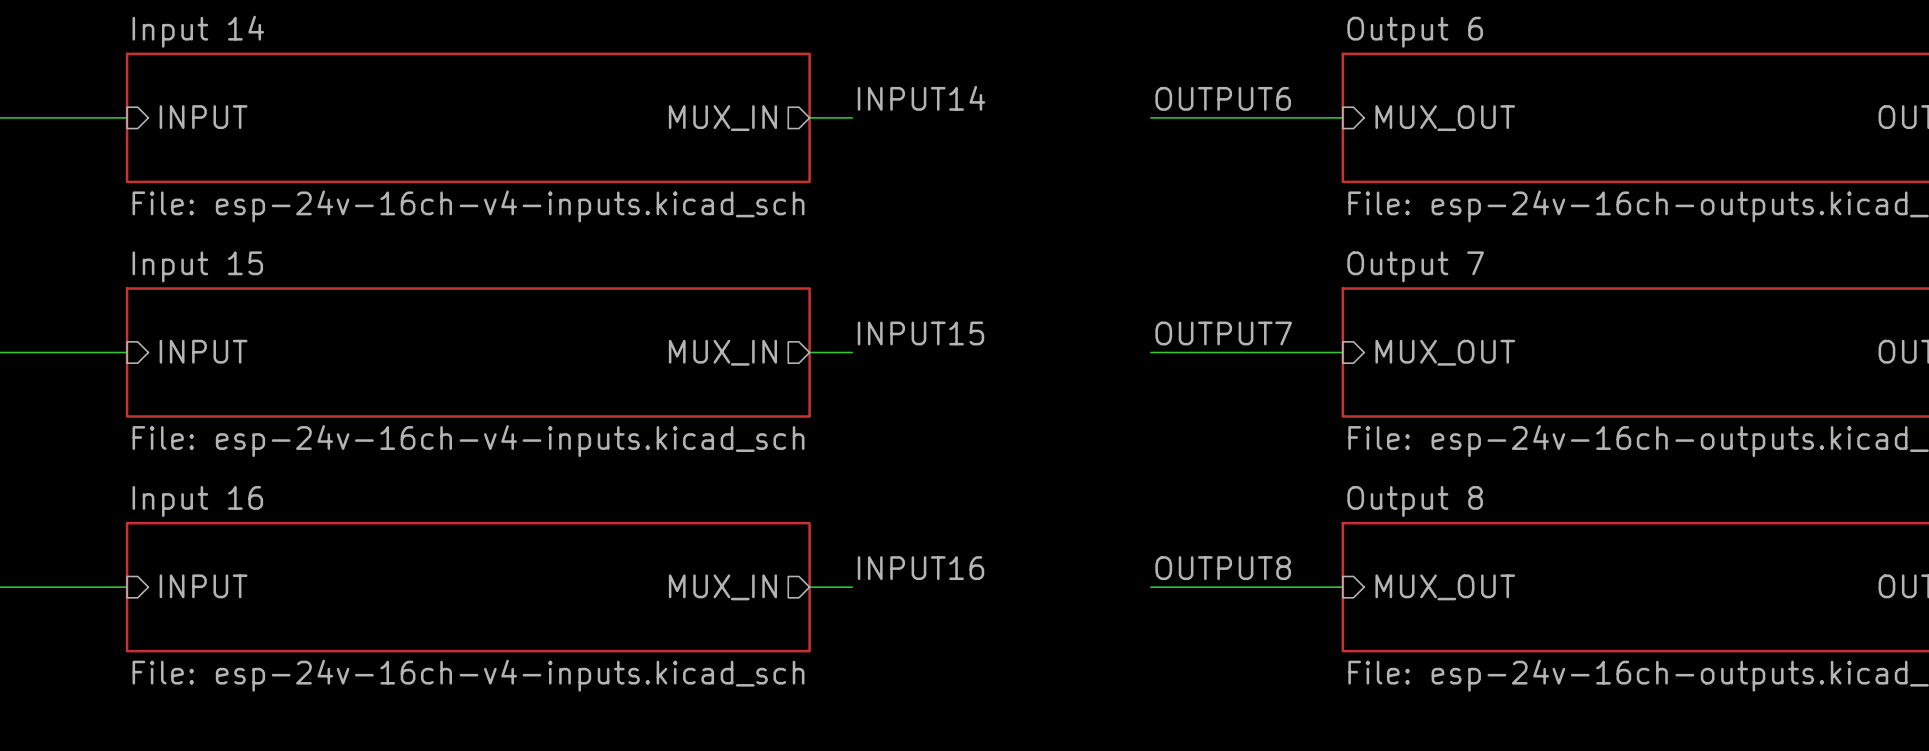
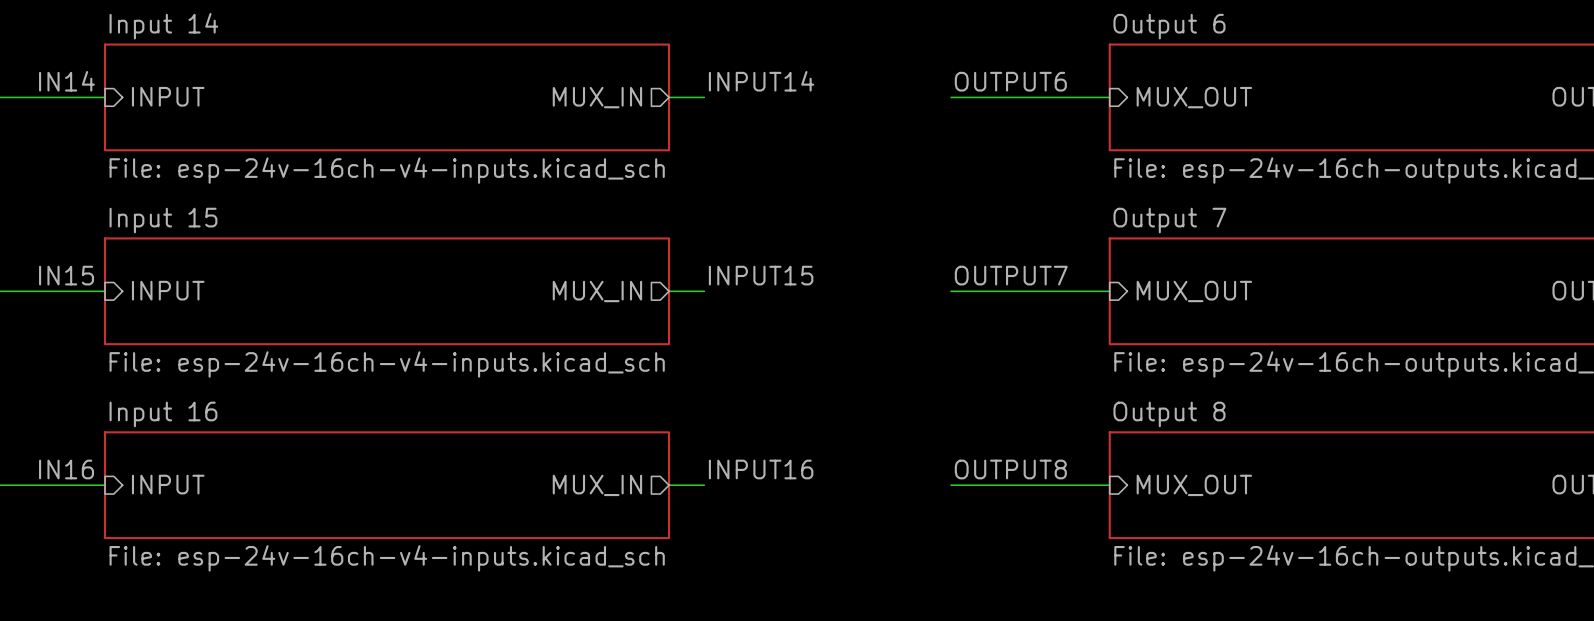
label: none -> IN14 (66, 81)
label: none -> IN15 (66, 275)
label: none -> IN16 (66, 469)

